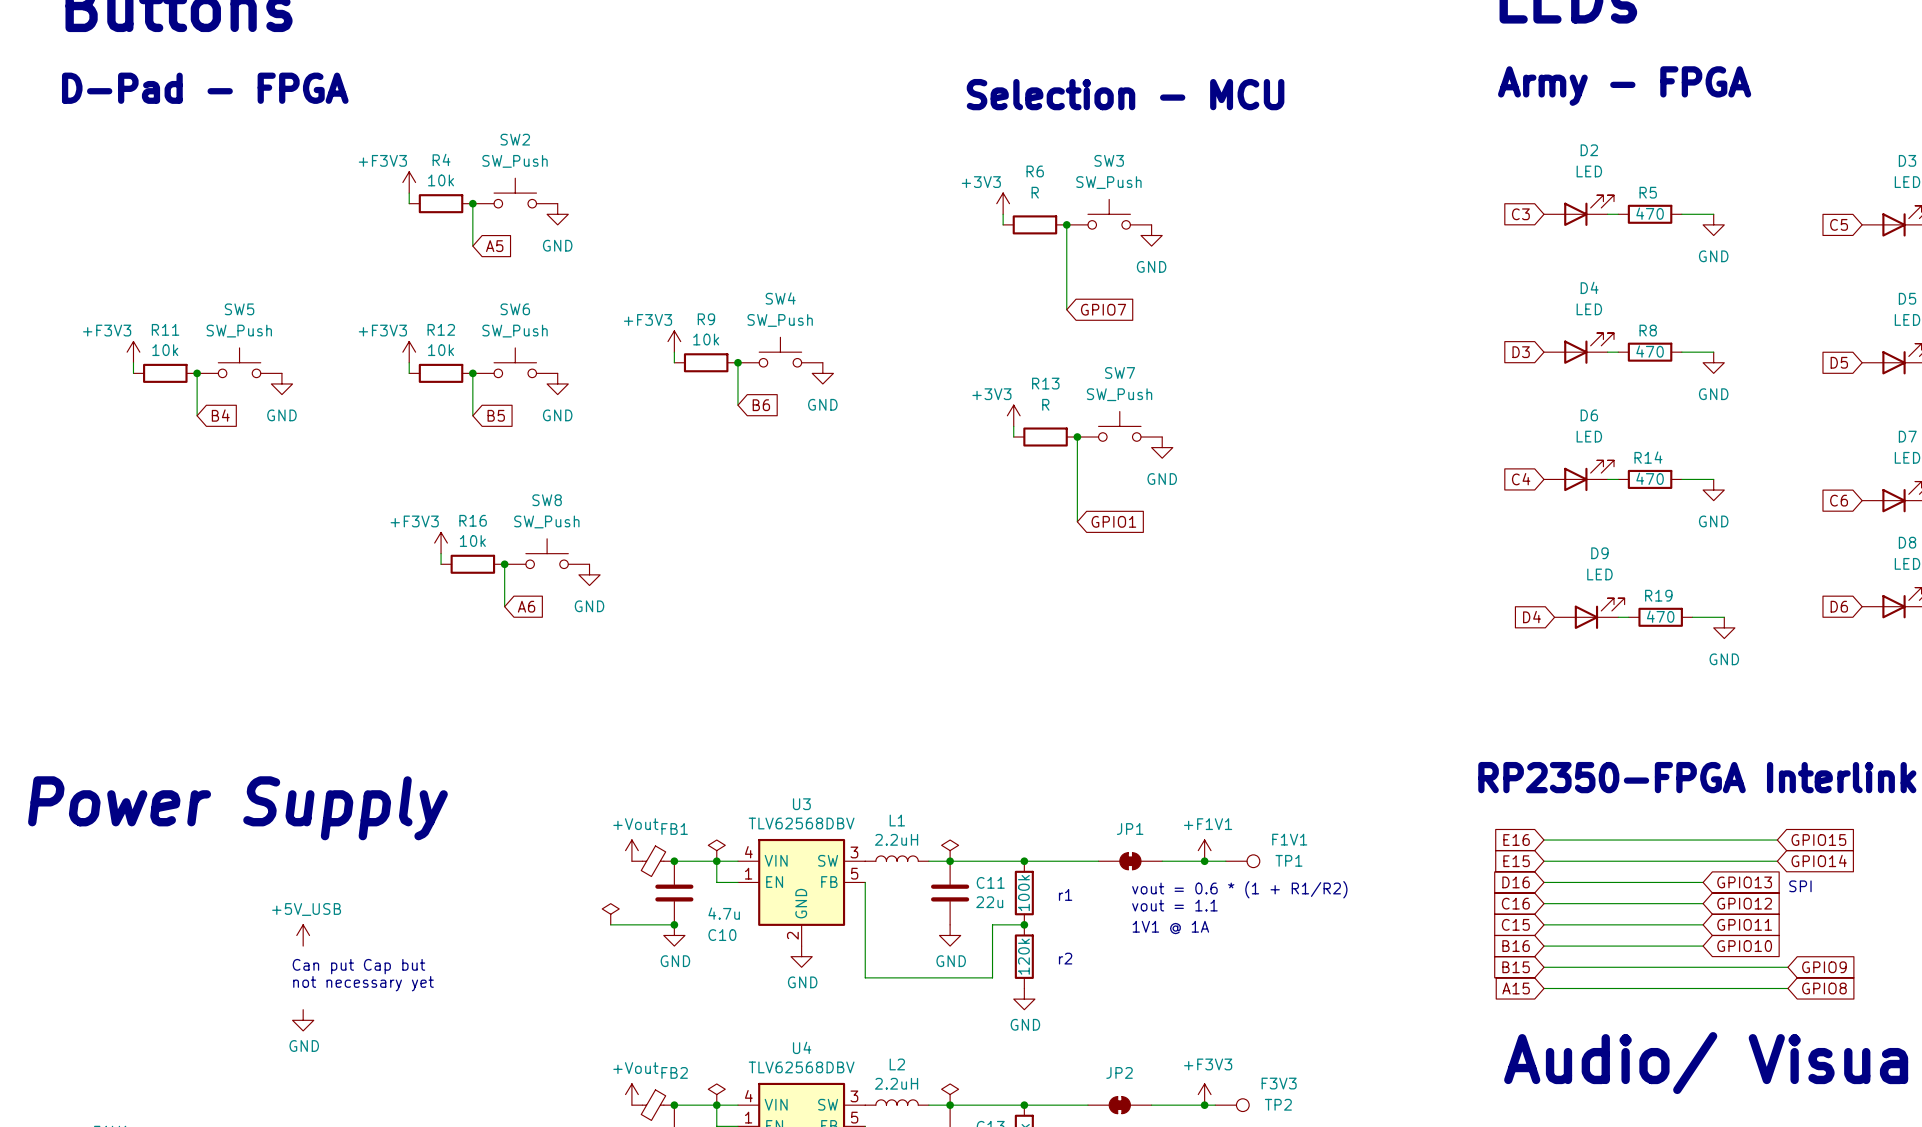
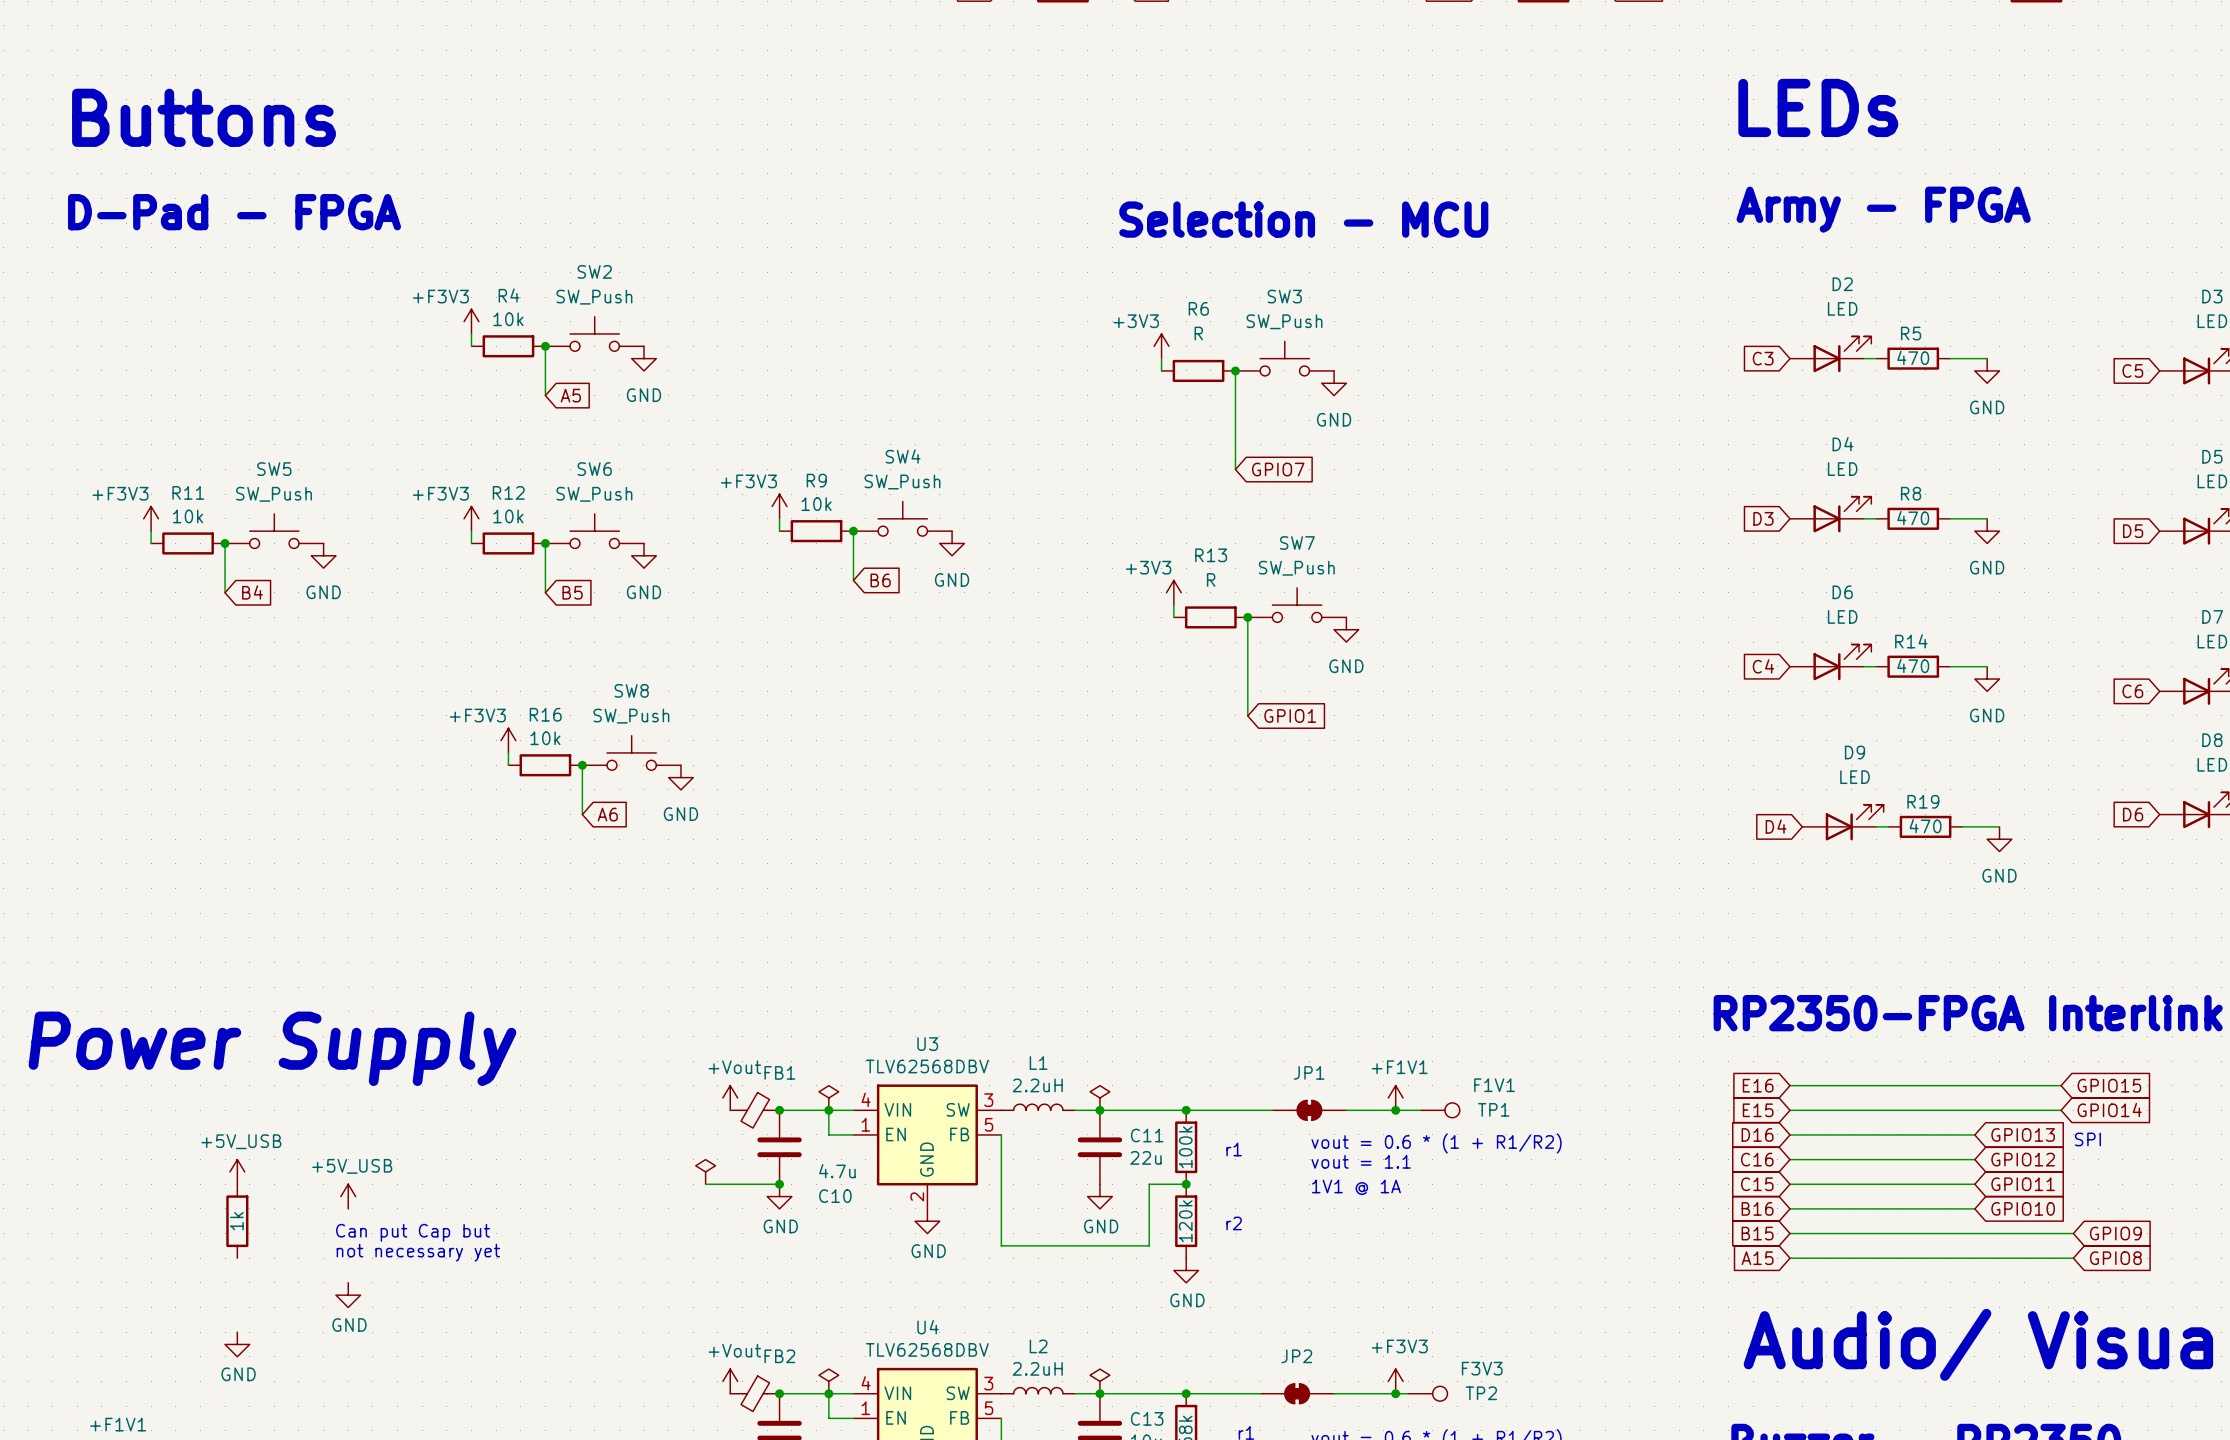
power symbol: none -> +5V_USB (237, 1171)
part: none -> 1k (237, 1221)
power symbol: none -> GND (237, 1344)

